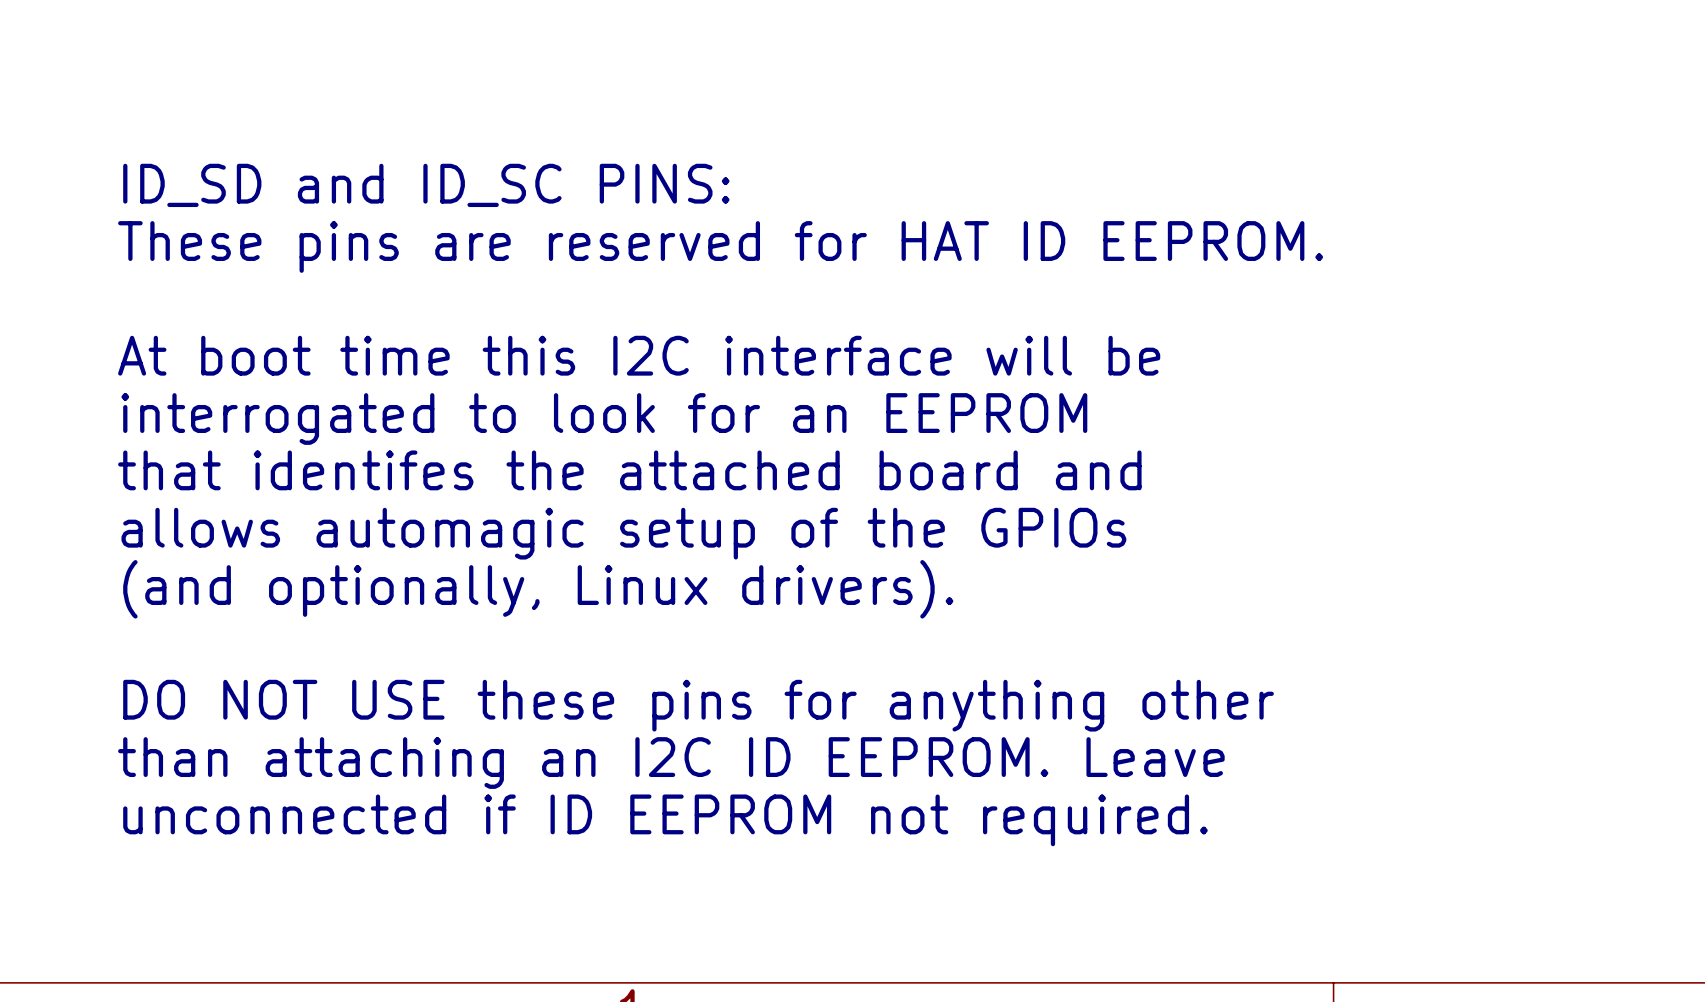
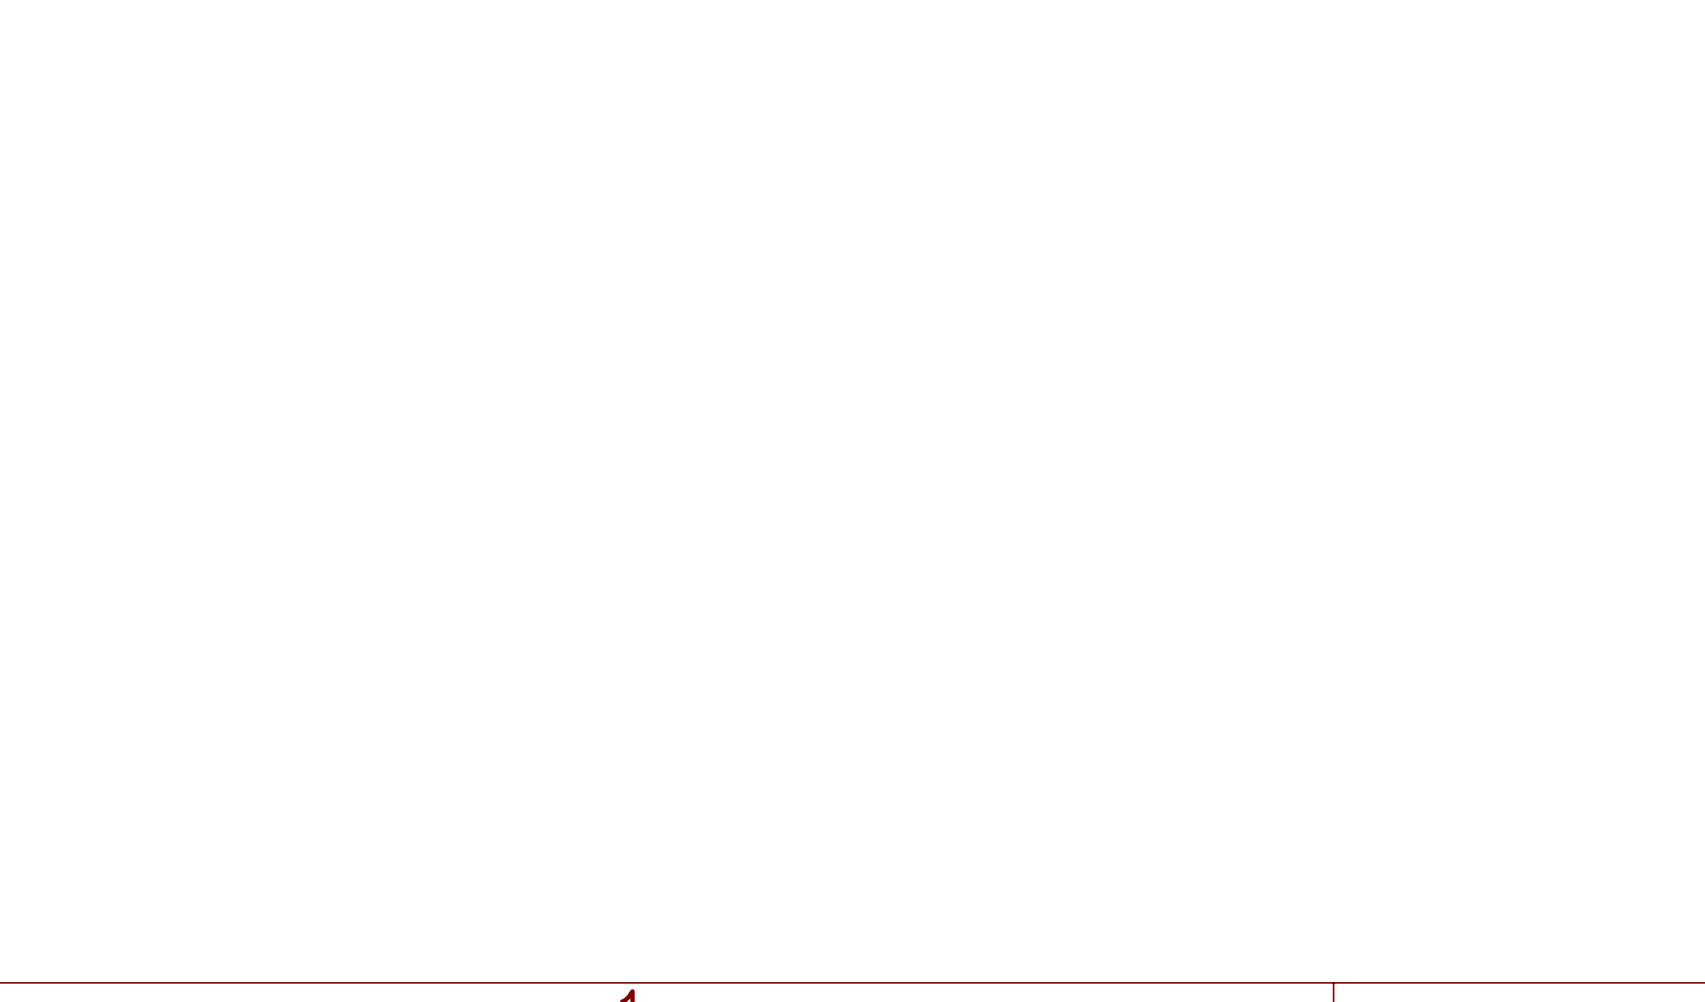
text: ID_SD and ID_SC PINS: (426, 185) -> none
text: These pins are reserved for HAT ID EEPROM. (720, 246) -> none
text: At boot time this I2C interface will be (639, 355) -> none
text: interrogated to look for an EEPROM (604, 418) -> none
text: that identifes the attached board and (629, 470) -> none
text: allows automagic setup of the GPIOs (623, 533) -> none
text: (and optionally, Linux drivers). (538, 589) -> none
text: DO NOT USE these pins for anything other (698, 705) -> none
text: than attaching an I2C ID EEPROM. Leave (671, 763) -> none
text: unconnected if ID EEPROM not required. (665, 820) -> none

